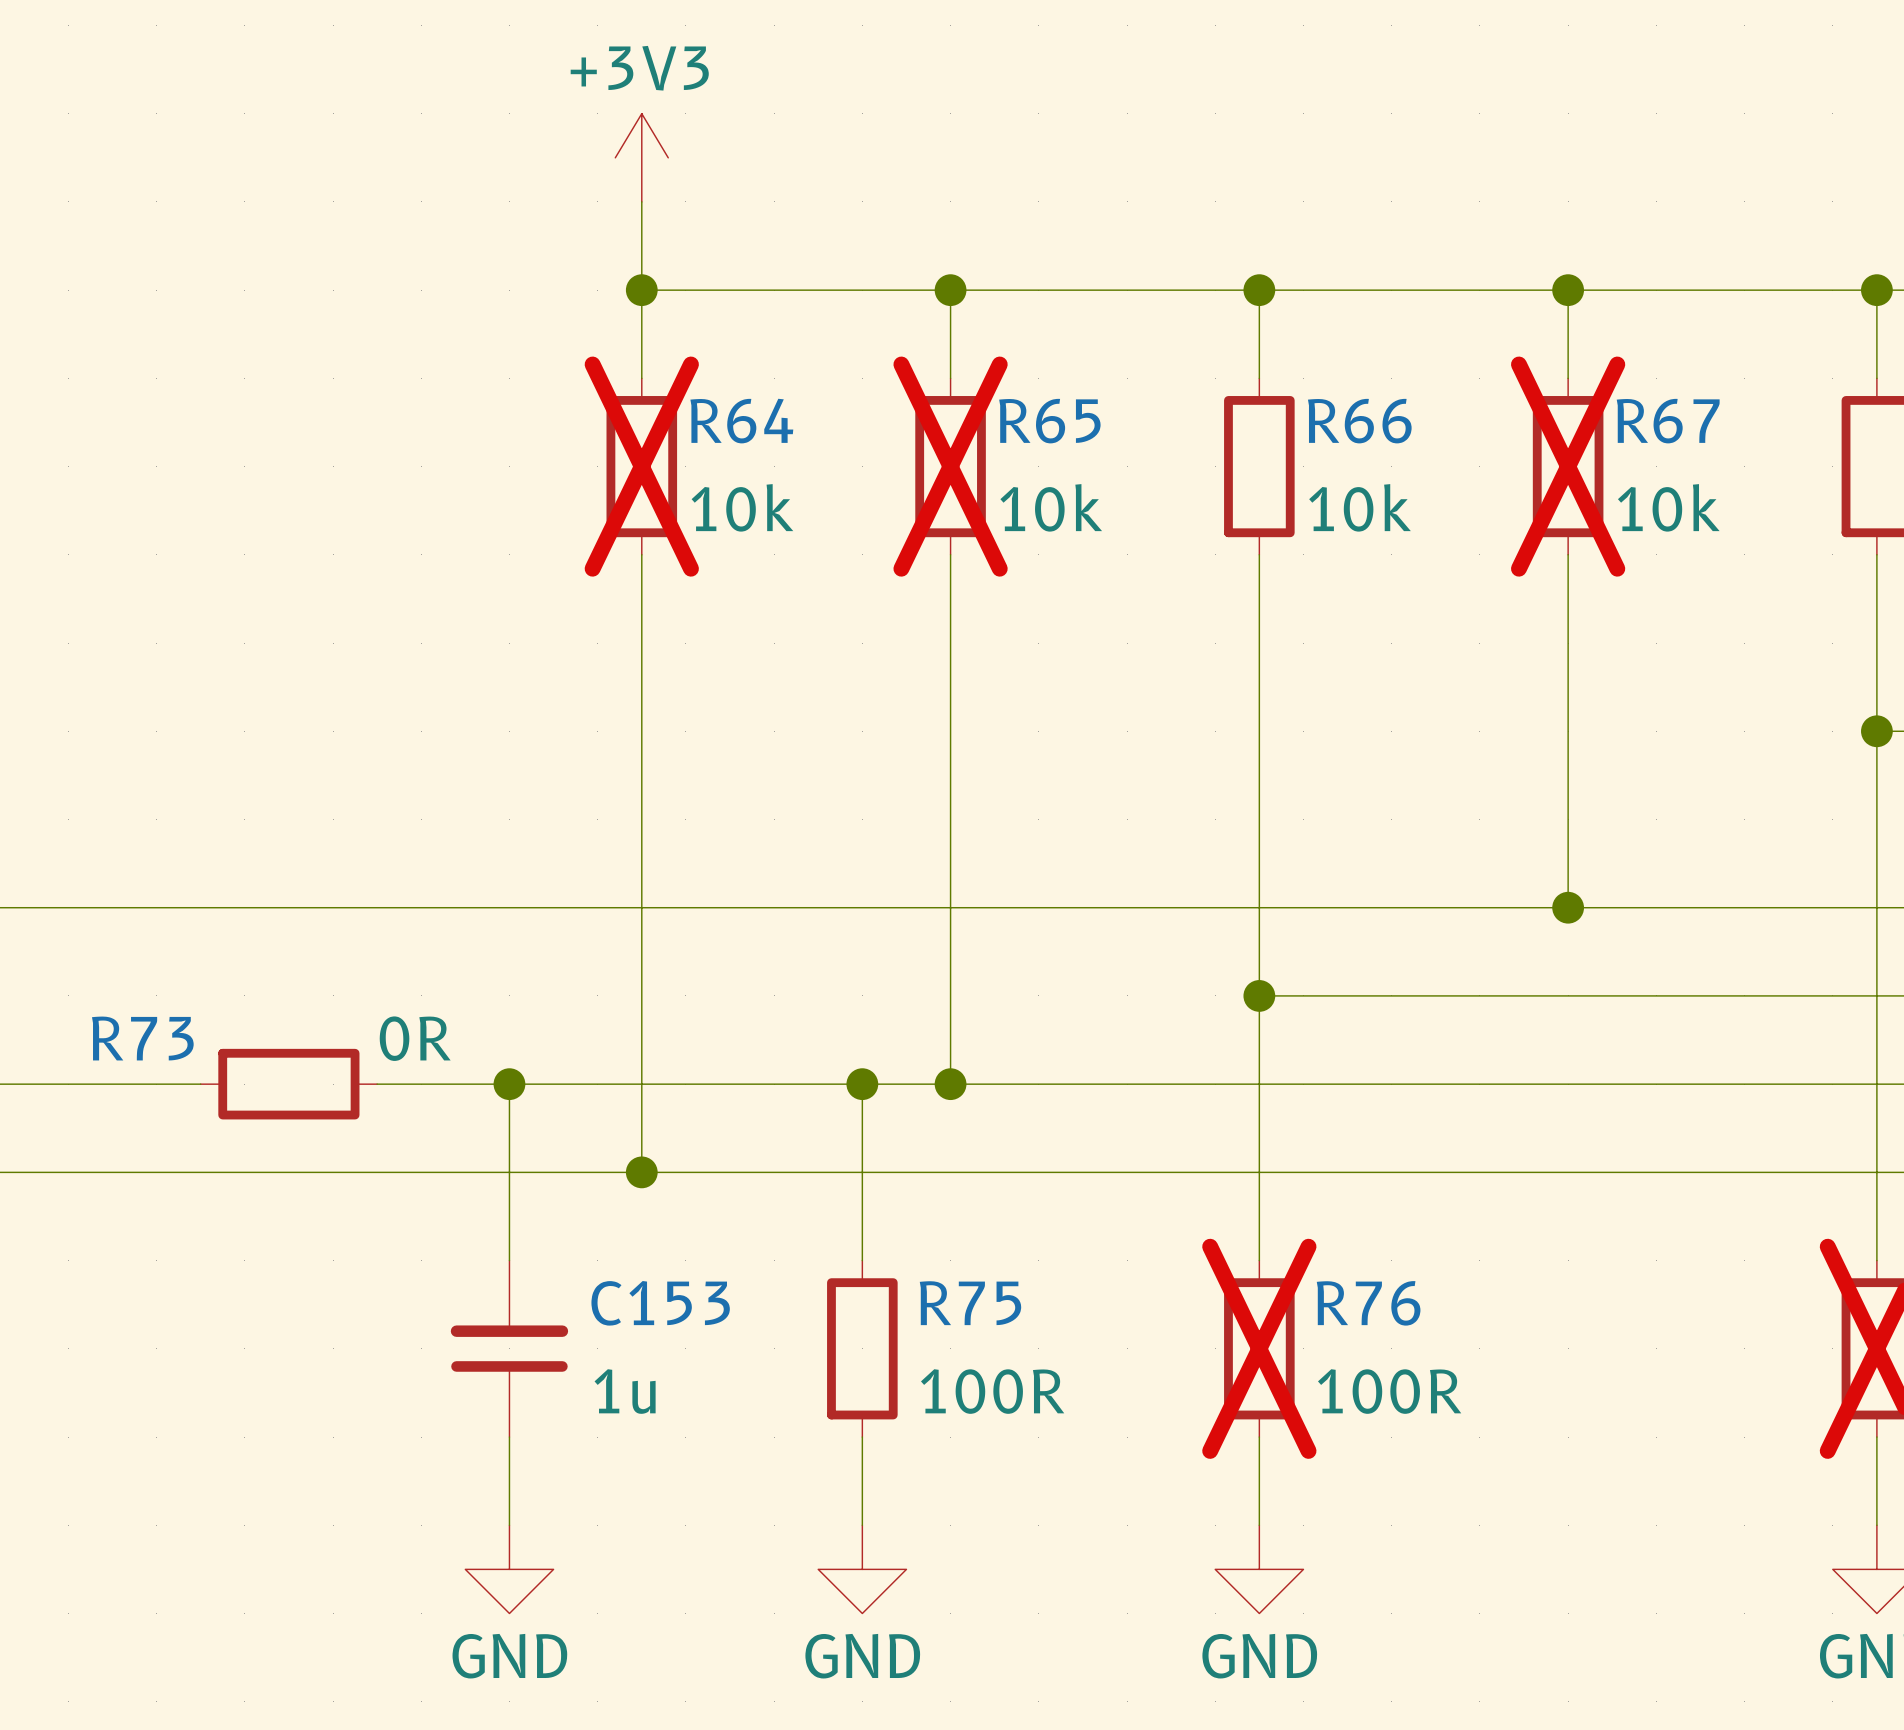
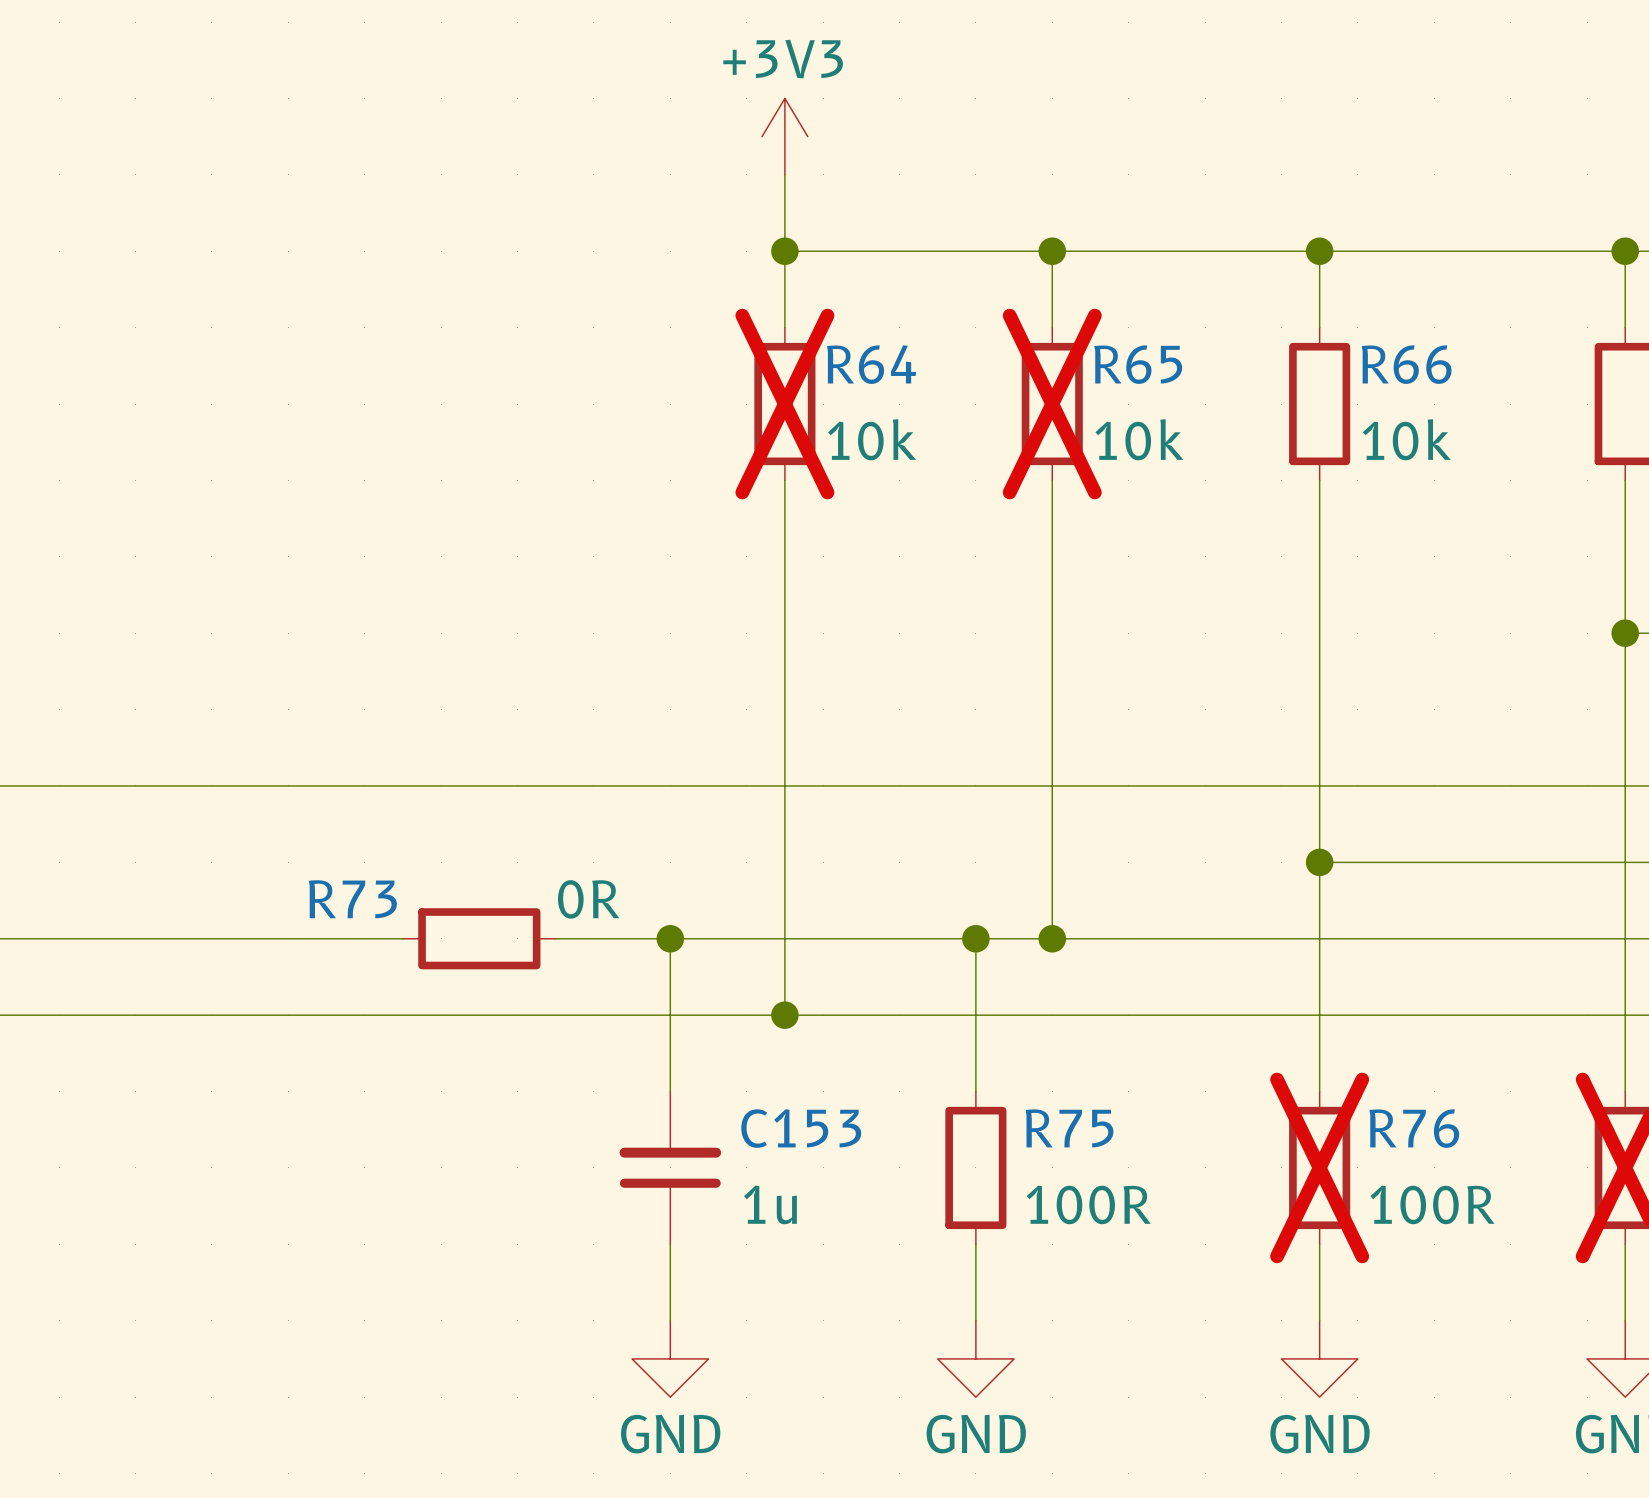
power symbol position: +3V3 (641, 157) -> +3V3 (784, 136)
wire: (641, 201) (641, 378) -> (784, 174) (784, 327)
wire: (641, 290) (906, 290) -> none
junction: (641, 290) -> none
wire: (950, 290) (950, 378) -> (1052, 251) (1052, 327)
junction position: (950, 290) -> (784, 251)
wire: (1259, 290) (1259, 378) -> (1319, 251) (1319, 327)
junction position: (1259, 290) -> (1052, 251)
wire: (1568, 290) (1568, 378) -> none
junction position: (1568, 290) -> (1319, 251)
R64 position: (641, 466) -> (784, 404)
R65 position: (950, 466) -> (1052, 404)
R66 position: (1259, 466) -> (1319, 404)
R67: (1568, 466) -> none
wire: (641, 554) (641, 1172) -> (784, 480) (784, 1015)
wire: (950, 554) (950, 1084) -> (1052, 480) (1052, 938)
wire: (1259, 554) (1259, 1260) -> (1319, 480) (1319, 1091)
wire: (1568, 554) (1568, 907) -> none
junction position: (1568, 907) -> (1319, 862)
wire: (1259, 995) (1524, 995) -> none
junction: (1259, 995) -> none
R73 position: (288, 1084) -> (479, 938)
wire: (465, 1084) (641, 1084) -> (173, 938) (326, 938)
wire: (509, 1084) (509, 1260) -> (670, 938) (670, 1091)
junction: (509, 1084) -> none
junction: none -> (670, 938)
wire: (862, 1084) (862, 1260) -> (975, 938) (975, 1091)
junction: (862, 1084) -> none
junction: (950, 1084) -> none
junction: none -> (975, 938)
junction: none -> (1052, 938)
junction: (641, 1172) -> none
junction: none -> (784, 1015)
C153 position: (509, 1348) -> (670, 1167)
R75 position: (862, 1348) -> (975, 1167)
R76 position: (1259, 1348) -> (1319, 1167)
wire: (509, 1437) (509, 1525) -> (670, 1244) (670, 1320)
wire: (862, 1437) (862, 1525) -> (975, 1244) (975, 1320)
wire: (1259, 1437) (1259, 1525) -> (1319, 1244) (1319, 1320)
power symbol: GND (509, 1569) -> none
power symbol position: GND (862, 1569) -> GND (670, 1358)
power symbol: none -> GND (975, 1358)
power symbol: GND (1259, 1569) -> none
power symbol: none -> GND (1319, 1358)

